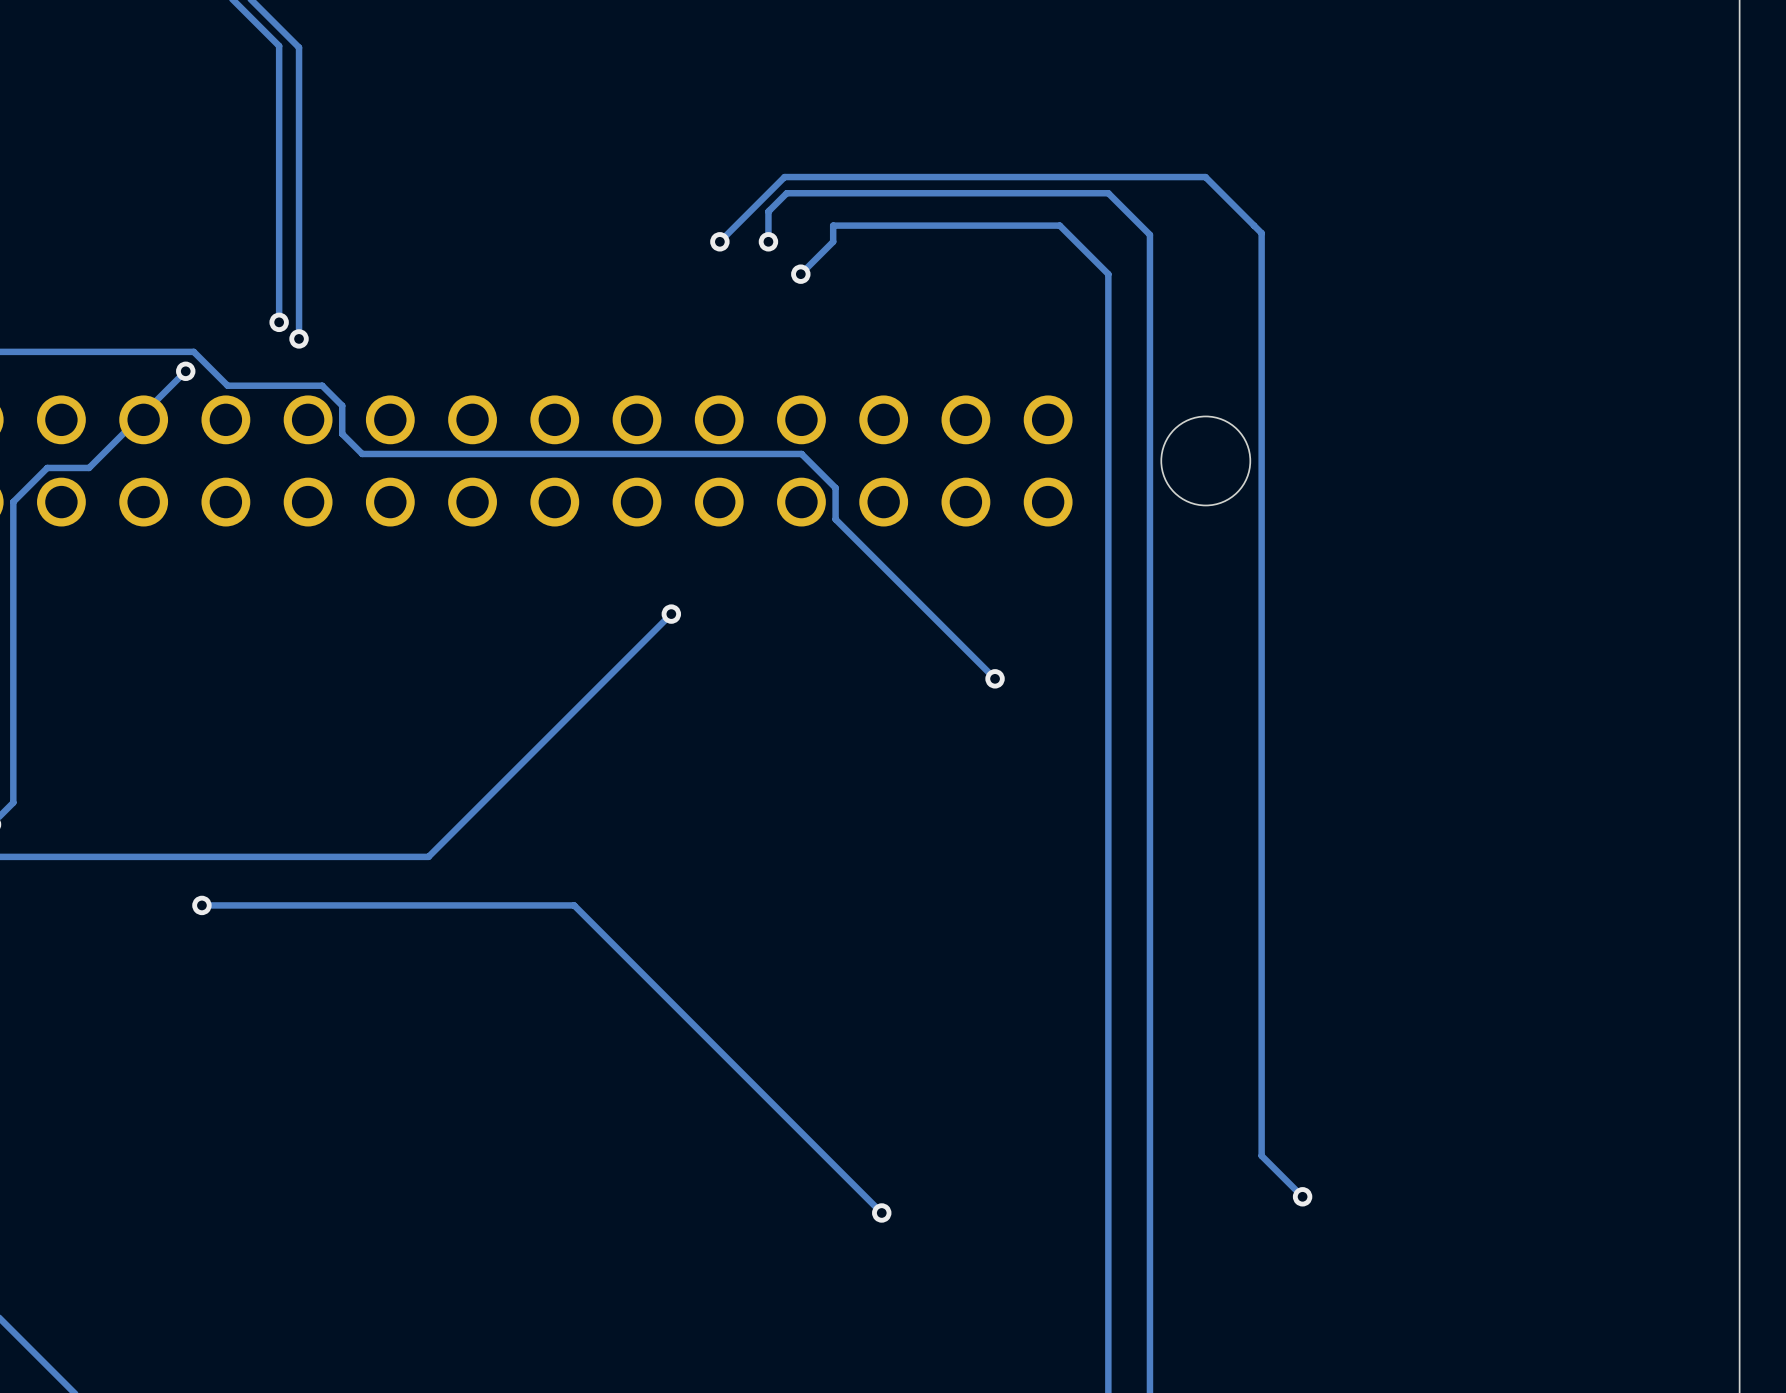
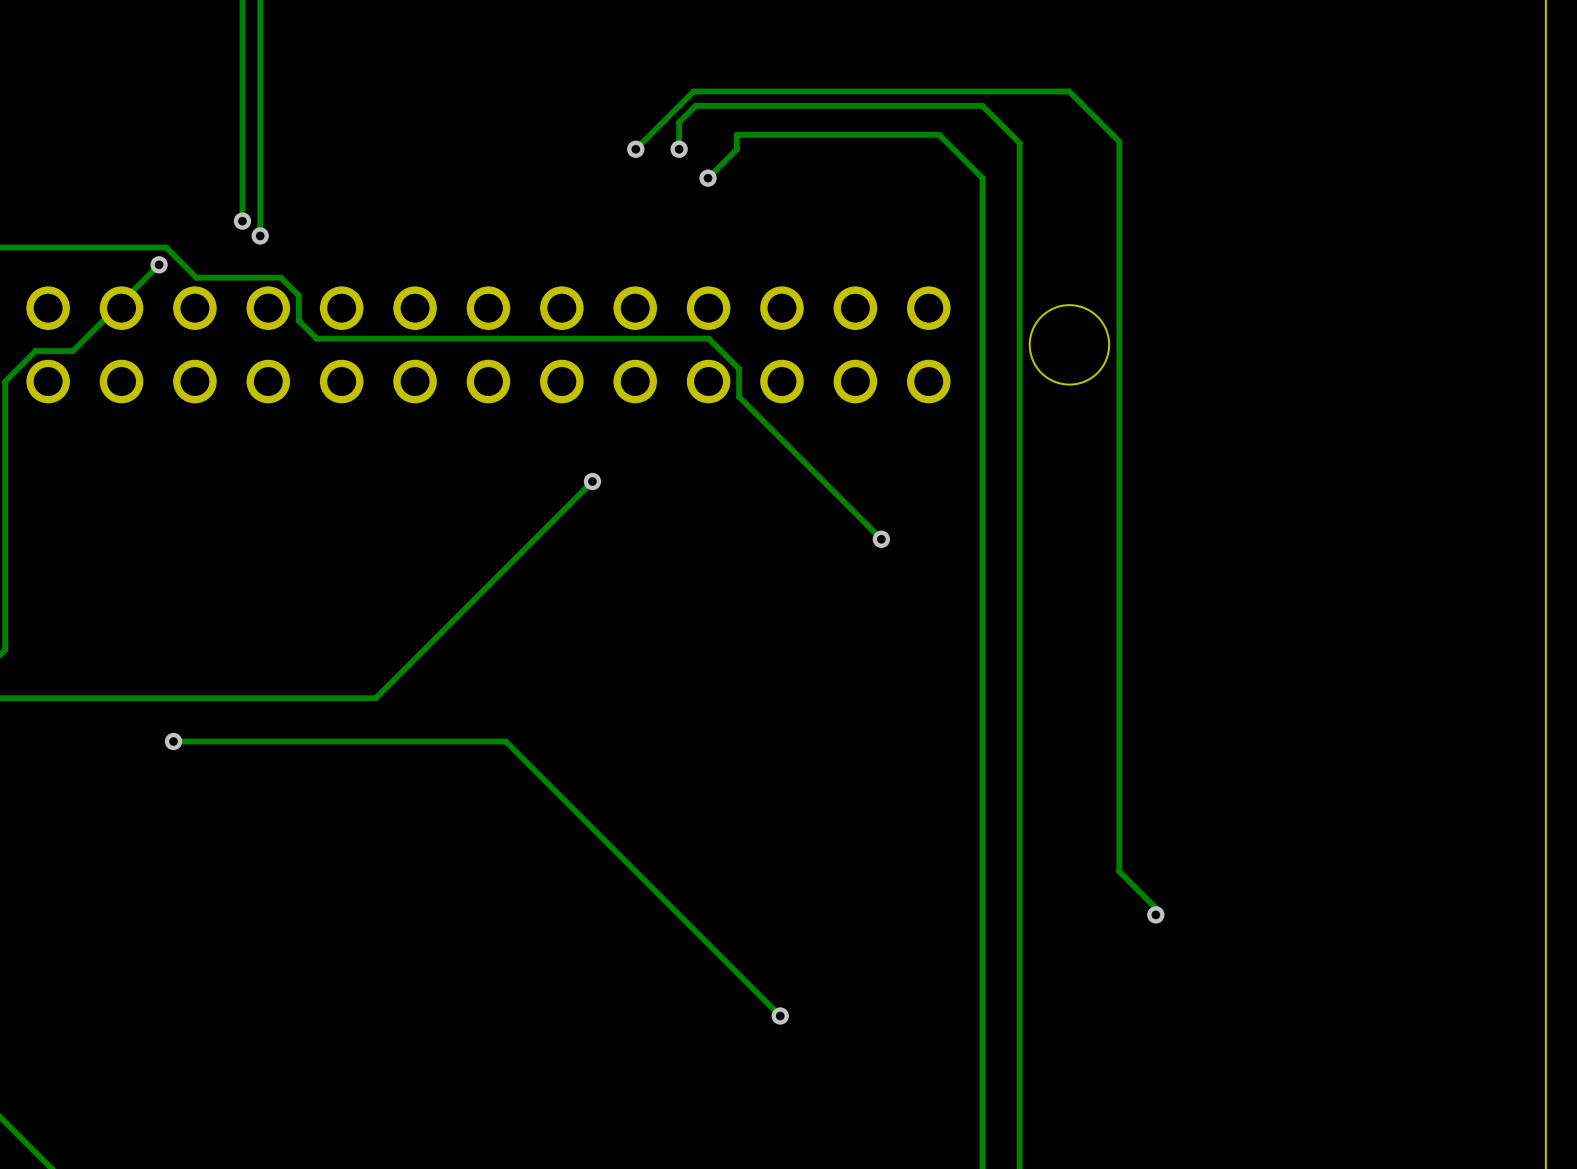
track: (1261, 1051) (1261, 1155) (1302, 1196) -> (1119, 871) (1155, 908) (1155, 914)
via position: (1302, 1196) -> (1155, 914)

